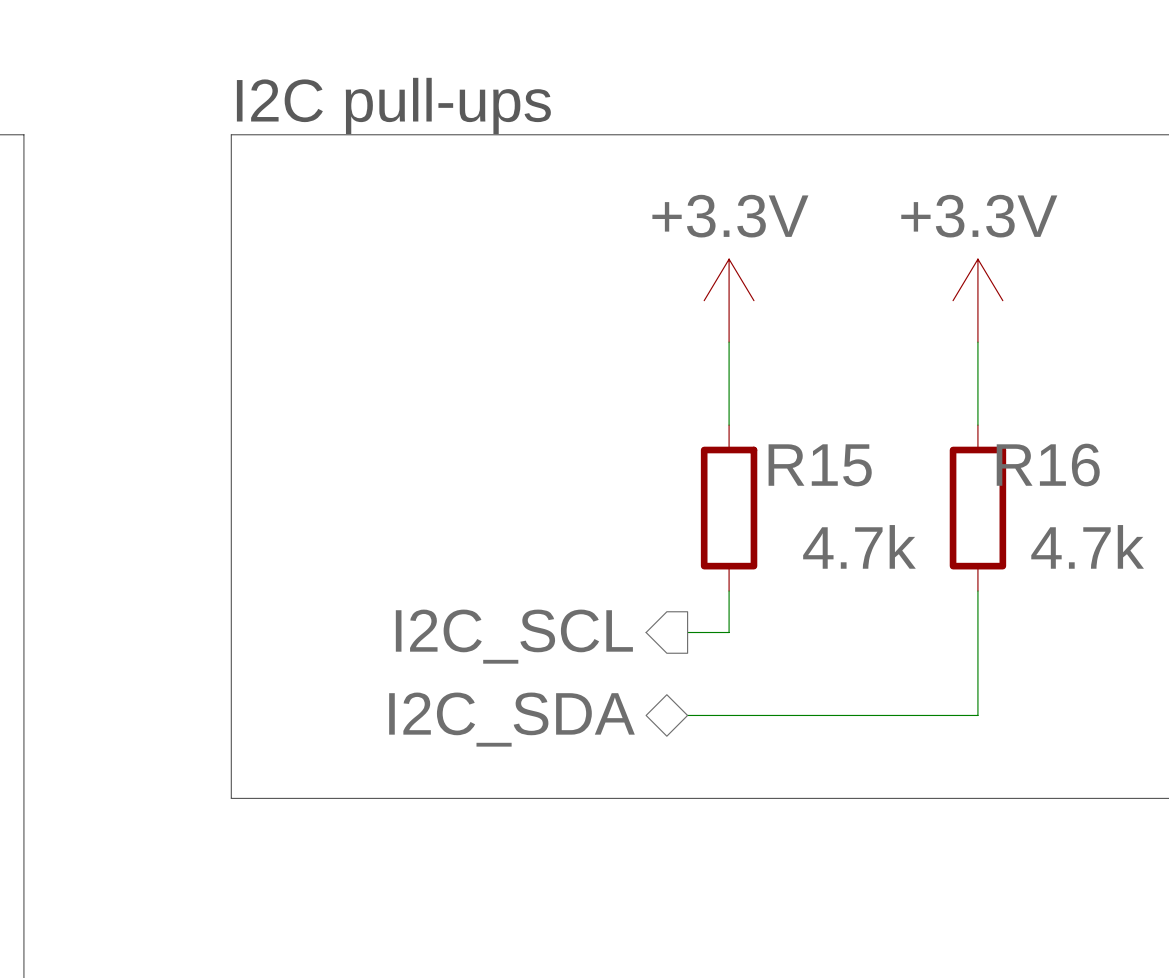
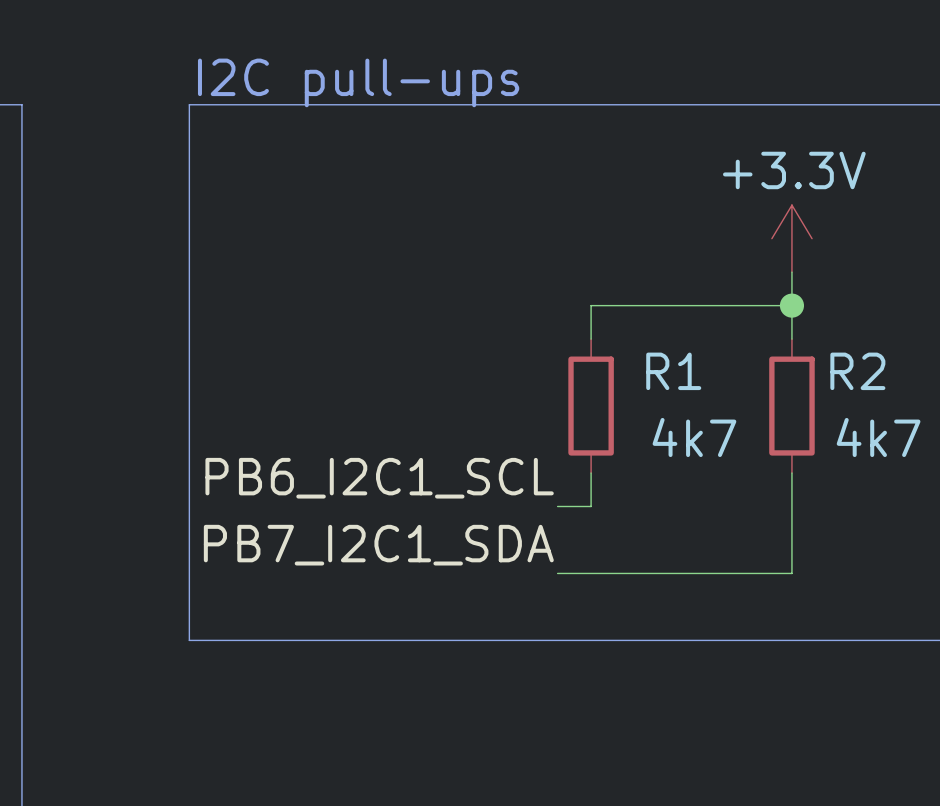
power symbol: +3.3V (729, 300) -> none
wire: (729, 342) (729, 383) -> (791, 305) (591, 305)
junction: none -> (791, 305)
R15 name: R15 (820, 465) -> R1 (673, 371)
R16 name: R16 (1048, 465) -> R2 (857, 371)
R15 value: 4.7k (859, 546) -> 4k7 (694, 437)
R16 value: 4.7k (1087, 546) -> 4k7 (878, 437)
label: none -> PB6_I2C1_SCL (379, 478)
hierarchical label: I2C_SCL (514, 636) -> none
label: none -> PB7_I2C1_SDA (378, 545)
hierarchical label: I2C_SDA (511, 719) -> none

